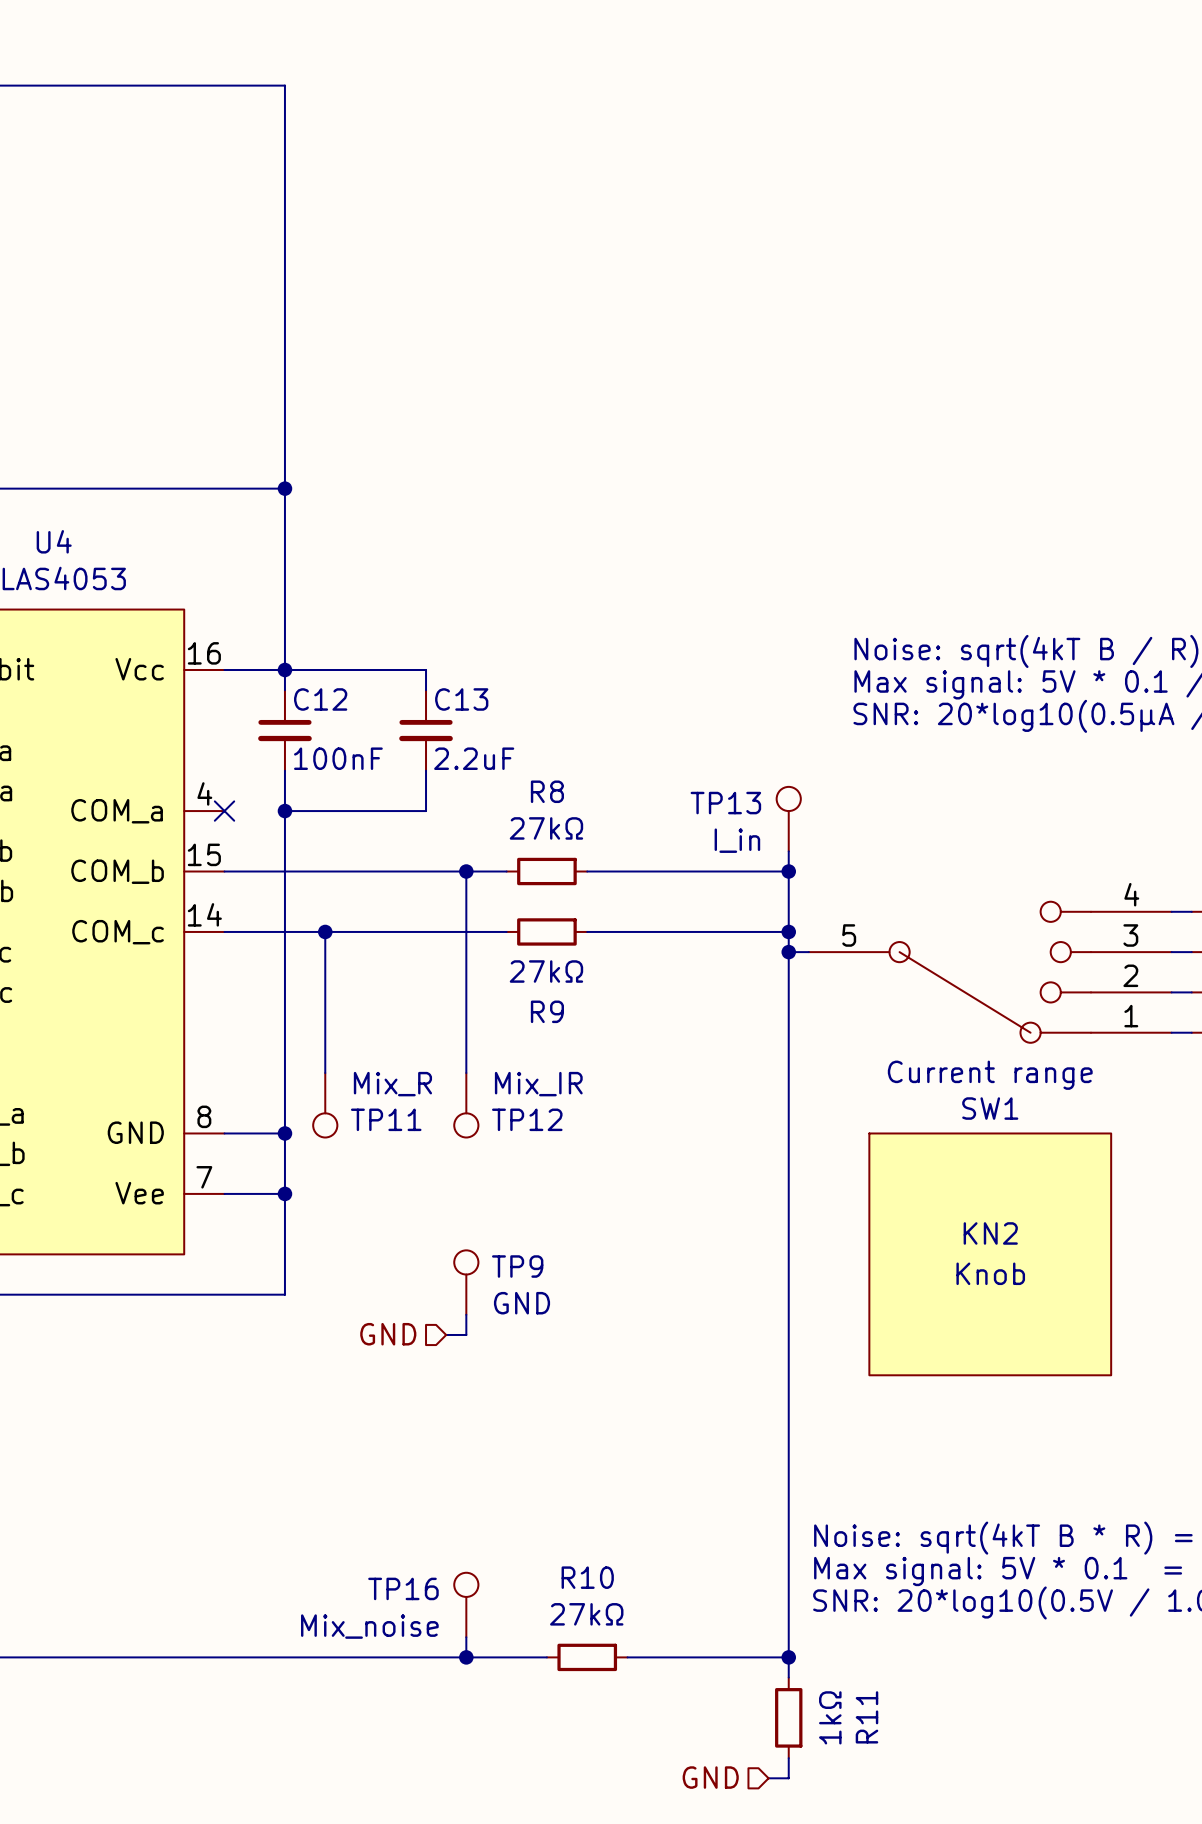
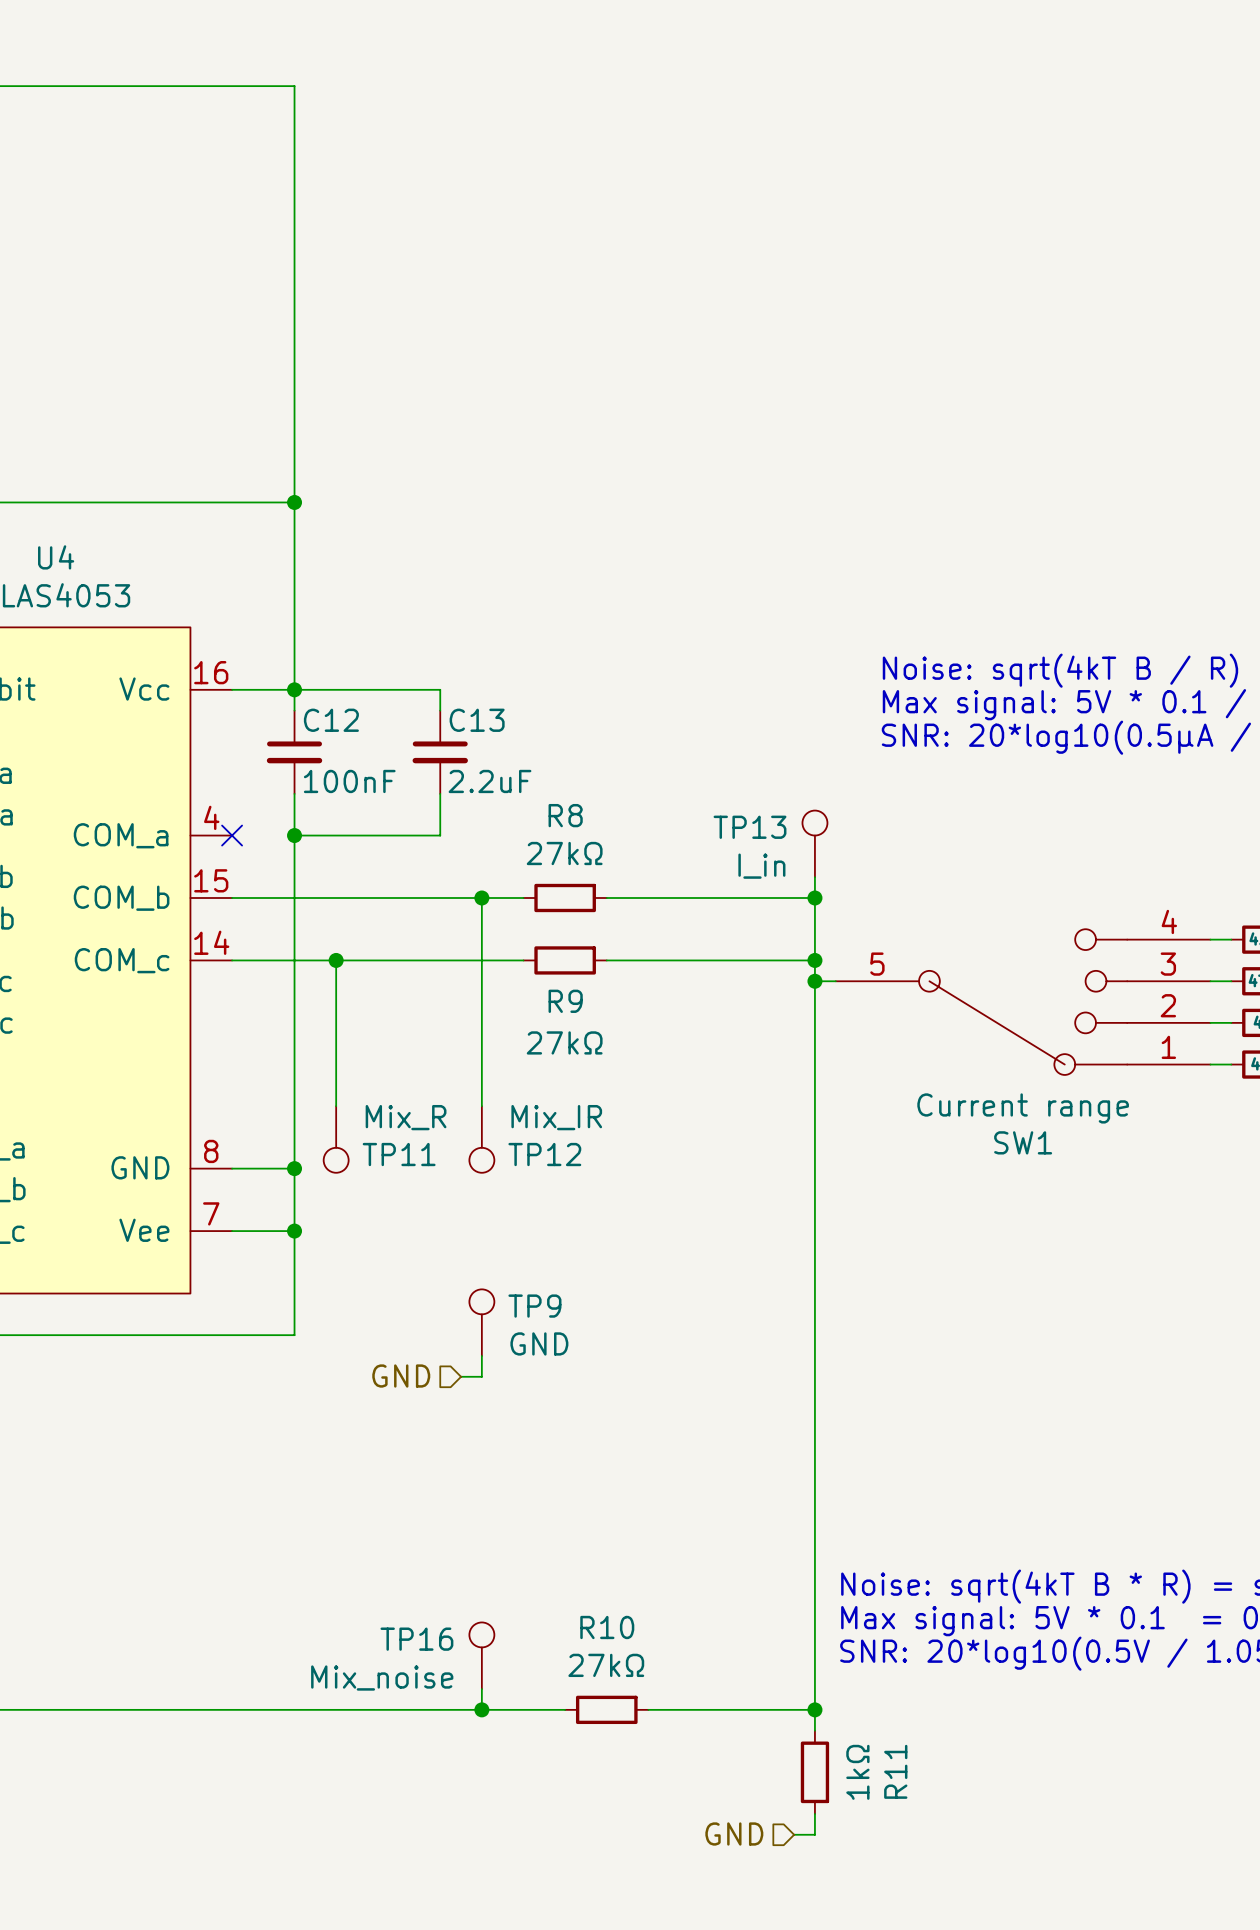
R9 value position: 27kΩ (546, 971) -> 27kΩ (564, 1042)
R9 name position: R9 (547, 1011) -> R9 (565, 1001)
KN2: Knob (990, 1254) -> none

